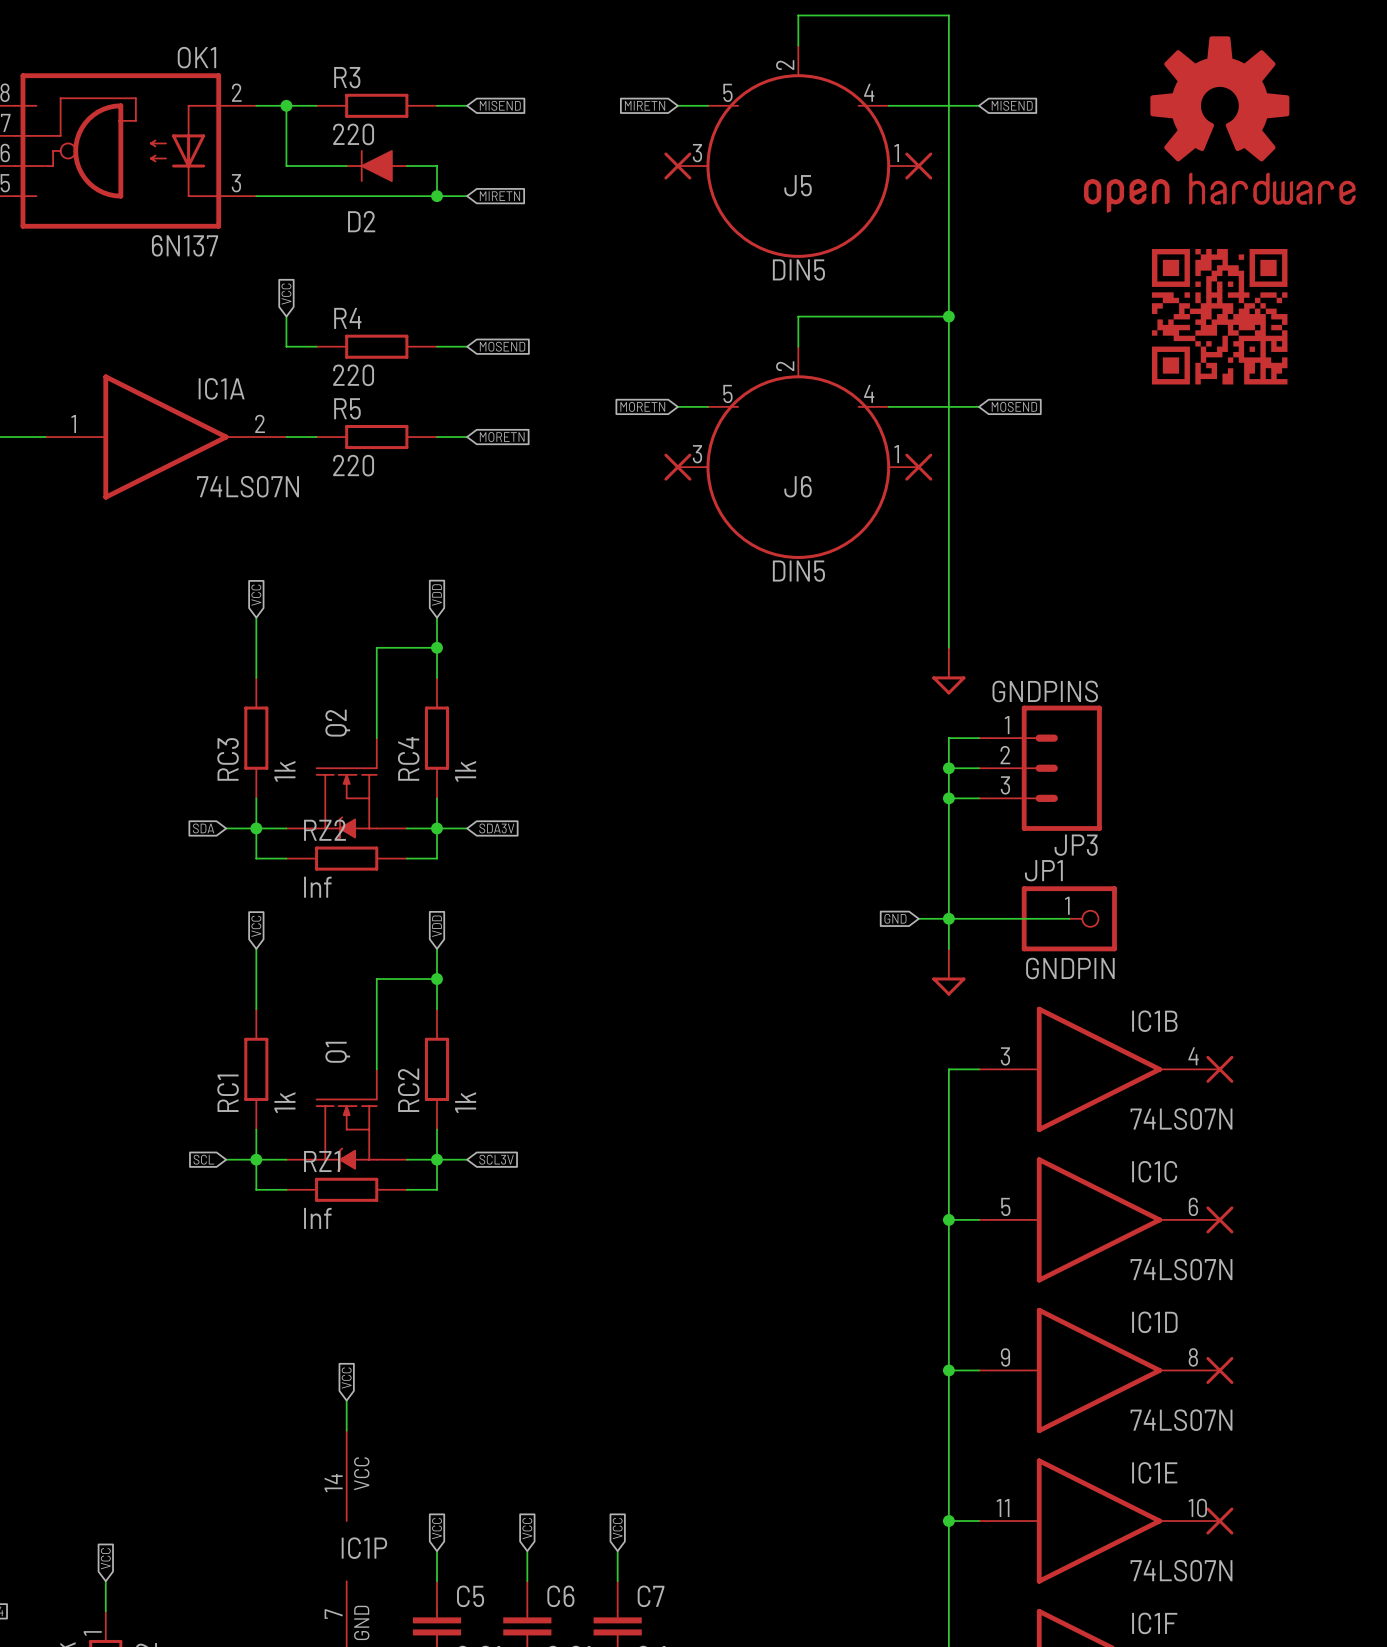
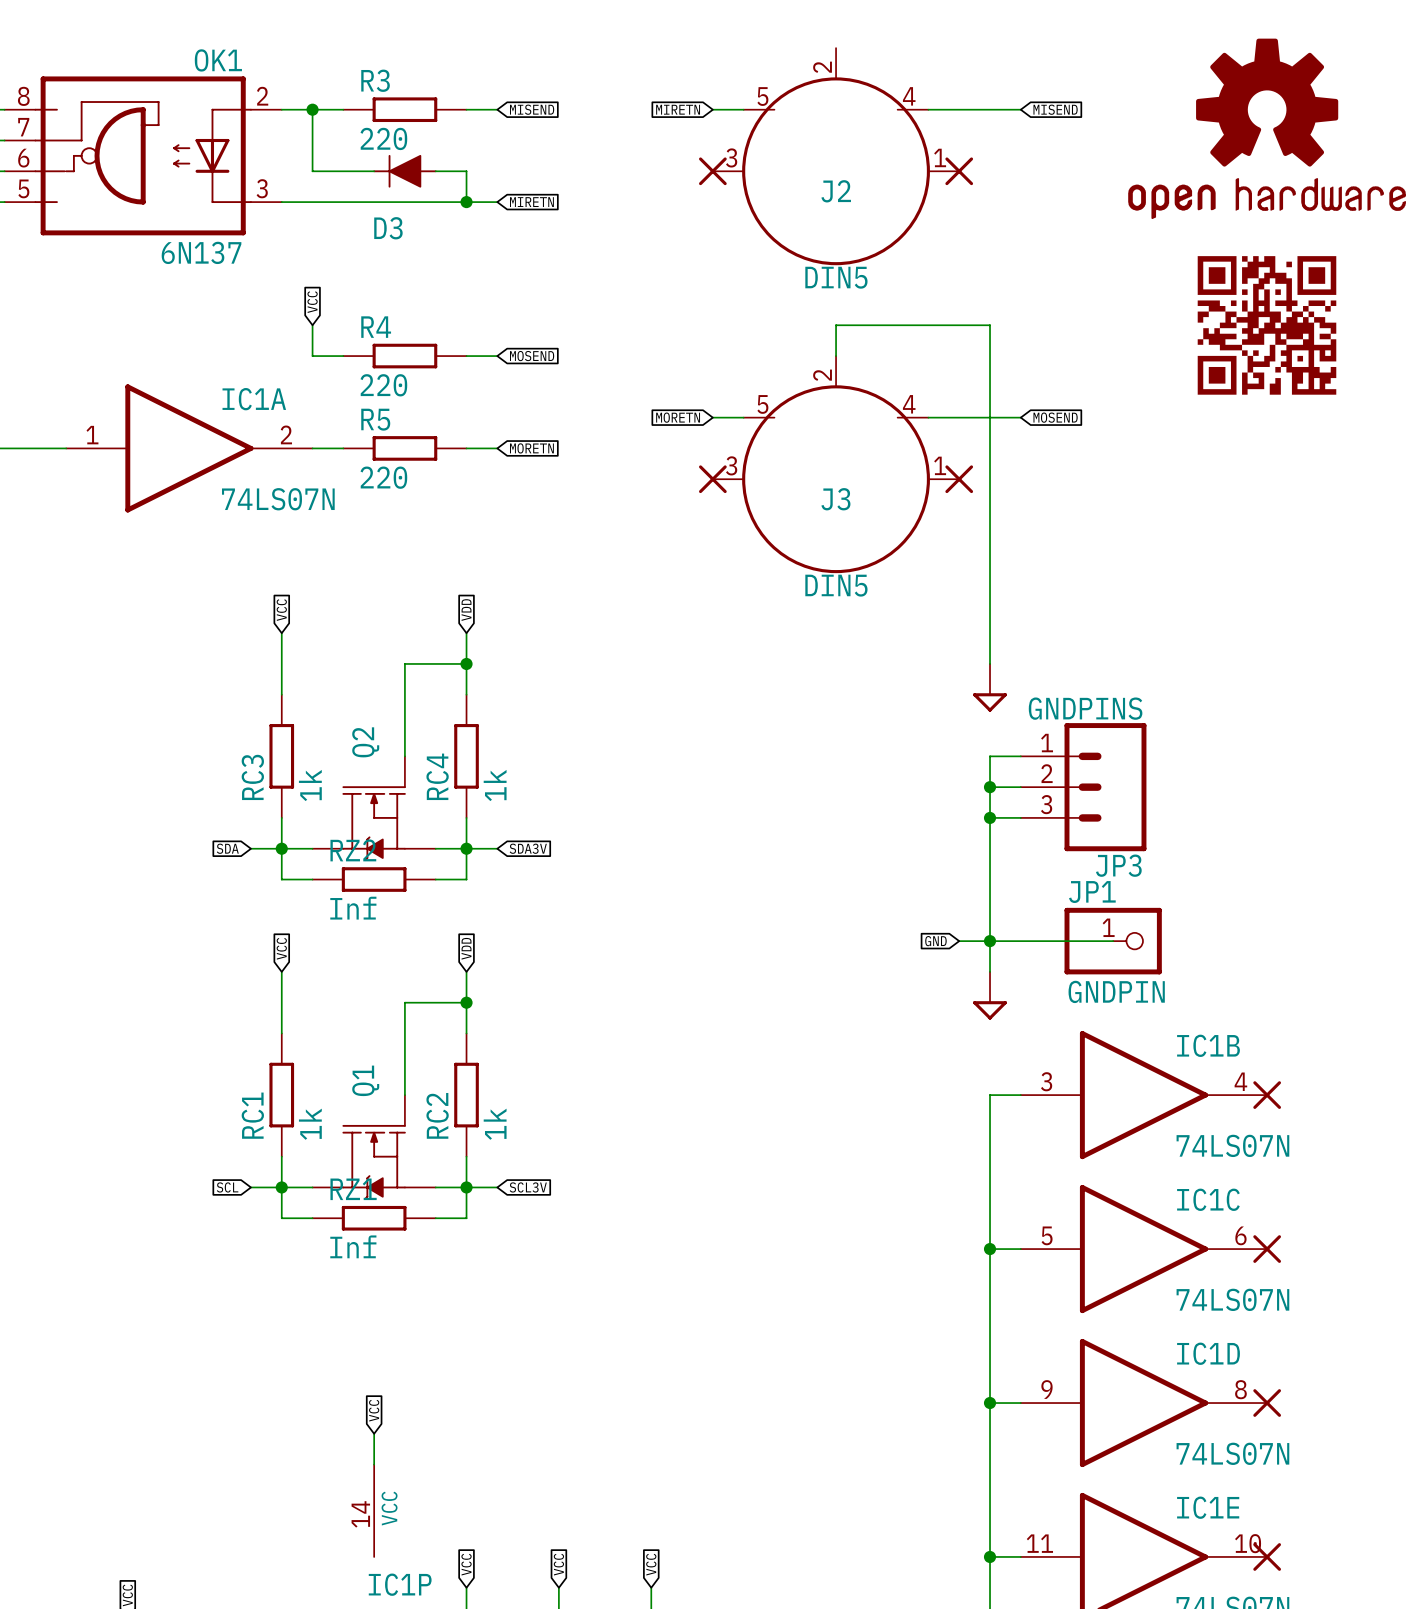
wire: (798, 45) (798, 15) (948, 15) (948, 316) -> none
J5 name: J5 (798, 185) -> J2 (836, 191)
D2 name: D2 (361, 221) -> D3 (388, 228)
junction: (948, 316) -> none
J6 name: J6 (798, 486) -> J3 (835, 499)

